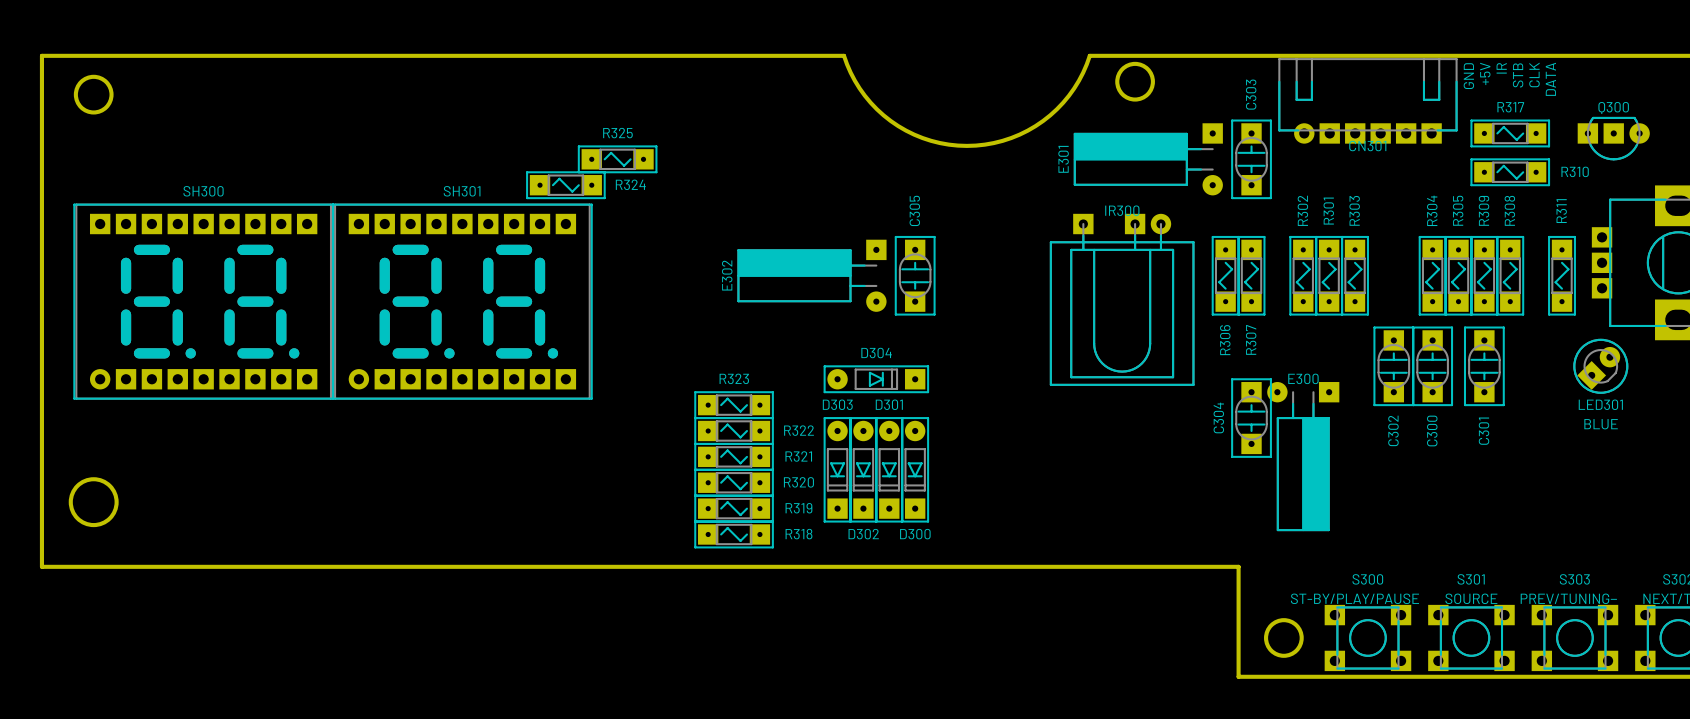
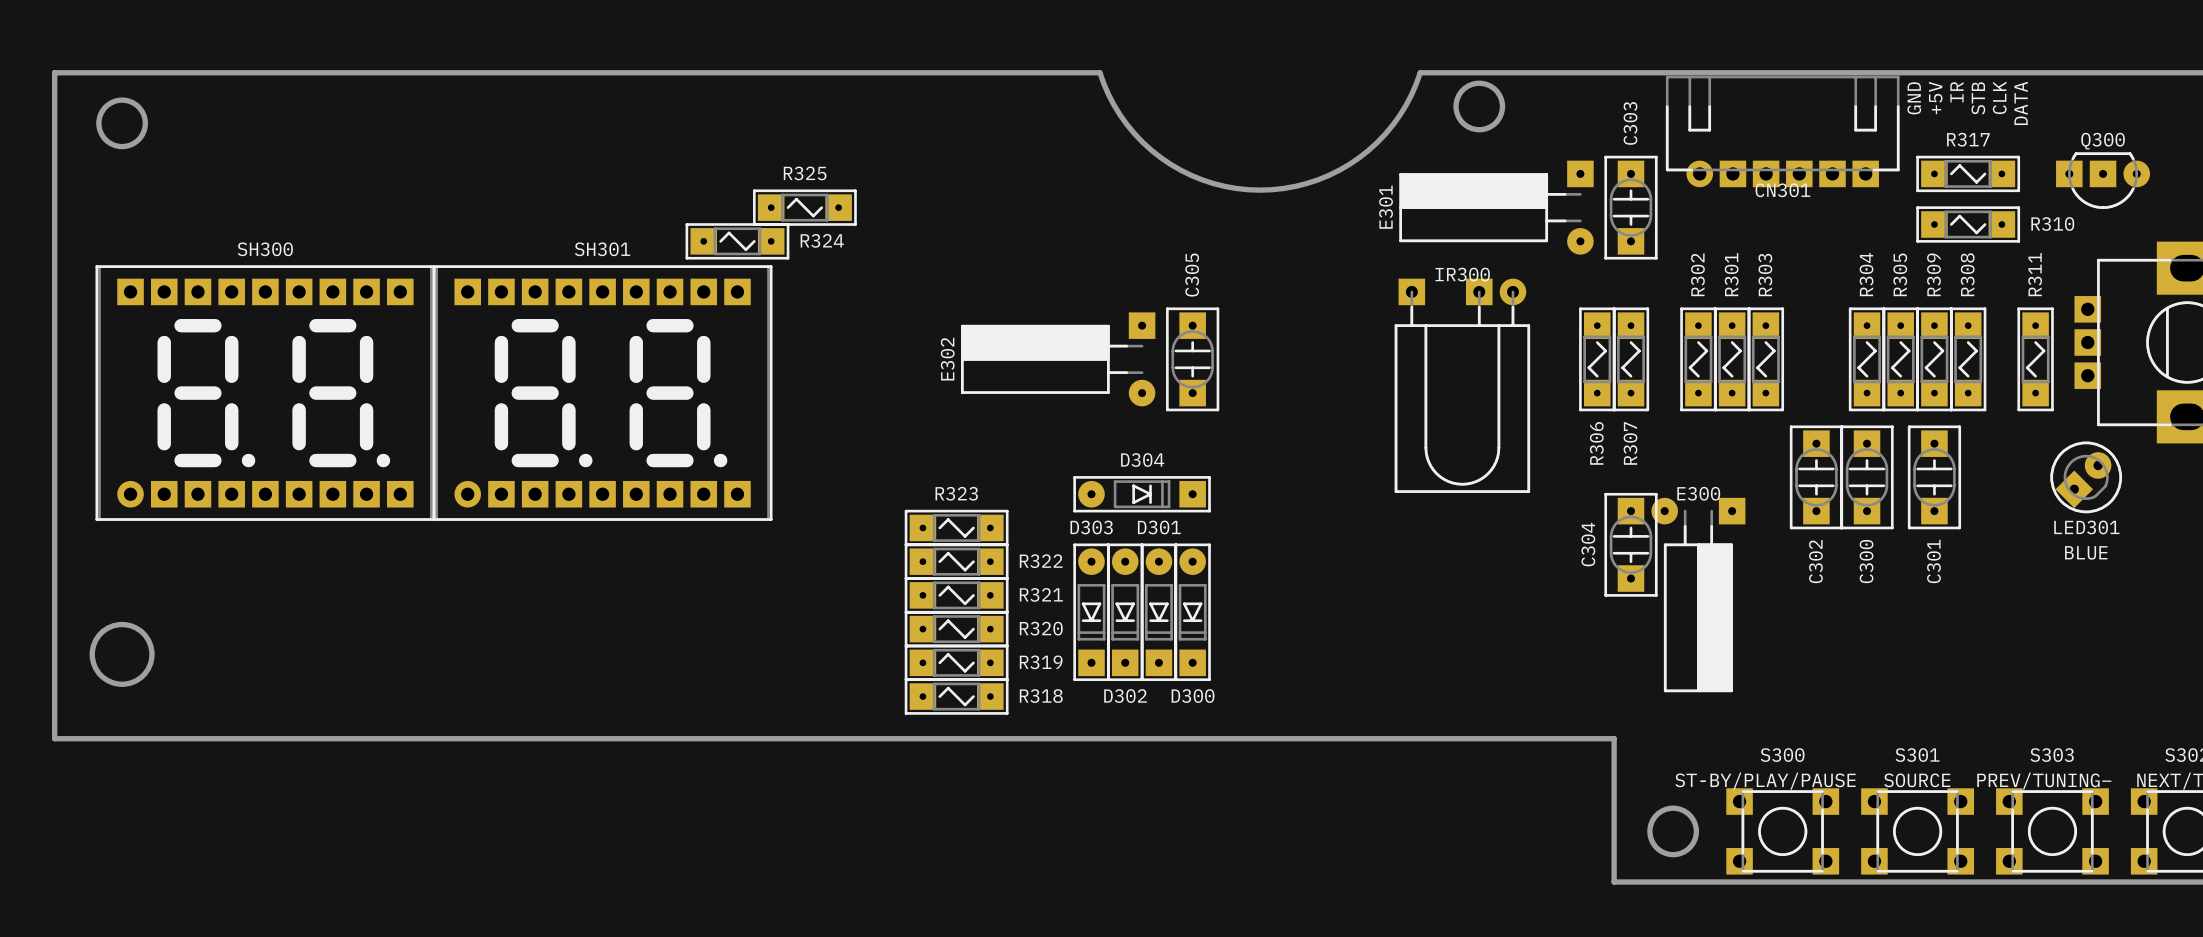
line: (1050, 242) (1193, 242) (1193, 384) (1050, 384) (1050, 242) -> none

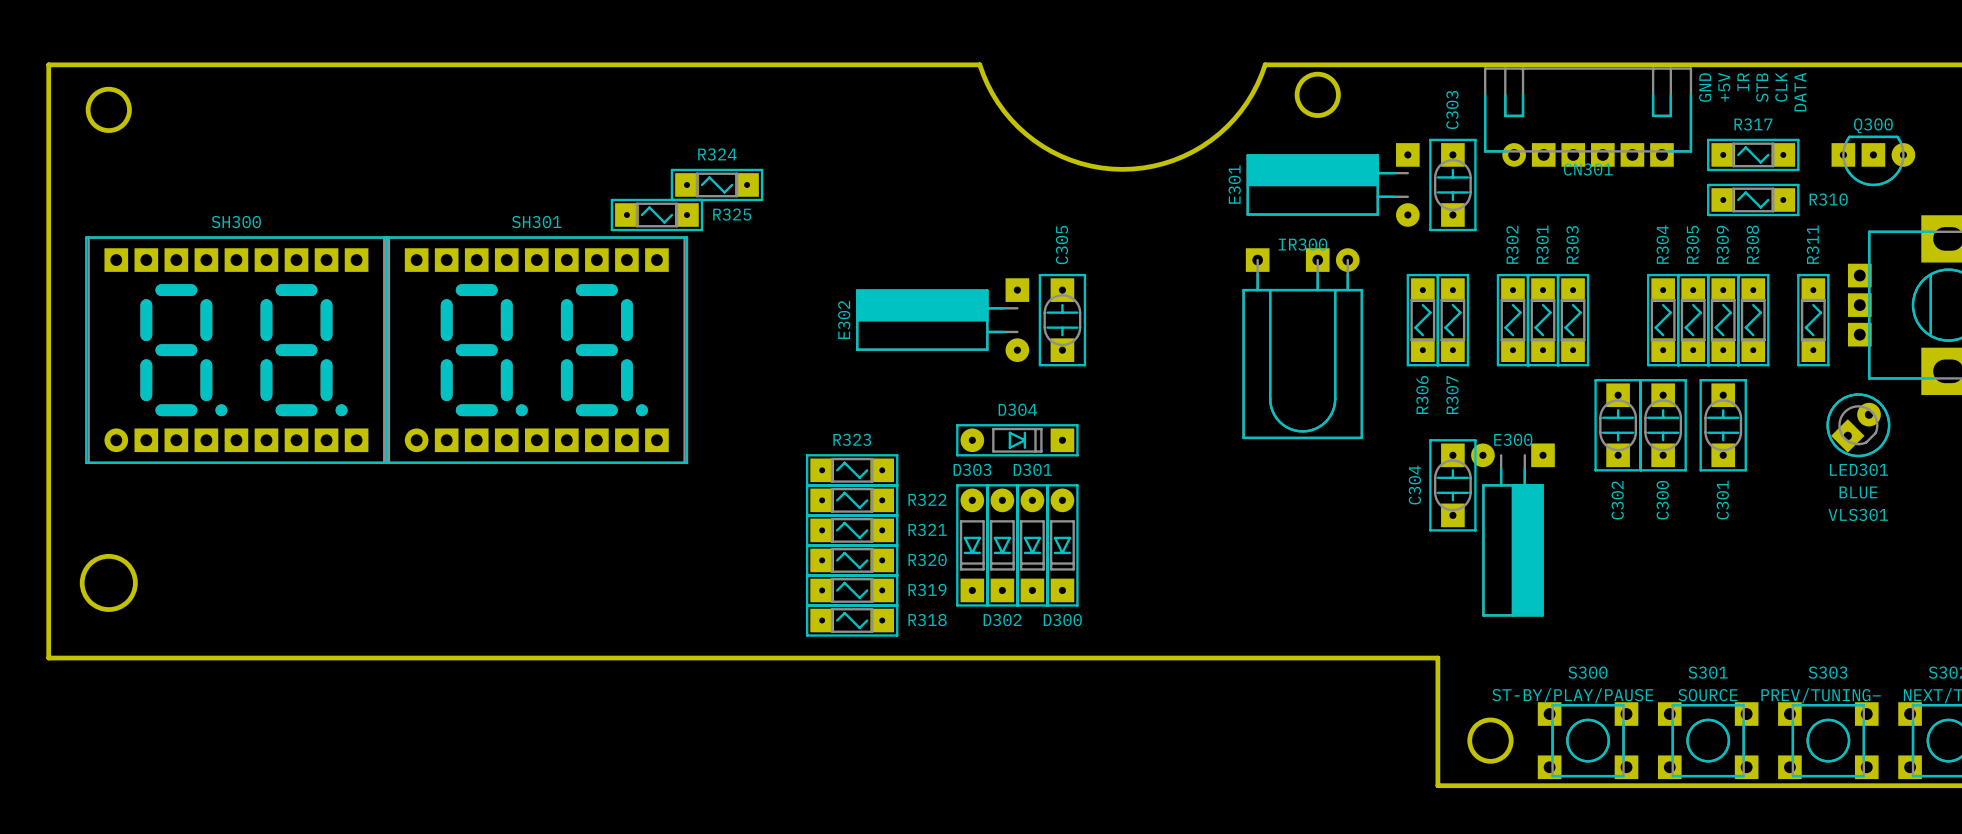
R325 name: R325 (805, 173) -> R324 (717, 154)
R324 name: R324 (822, 240) -> R325 (732, 214)
VLS301: none -> (1858, 425)

